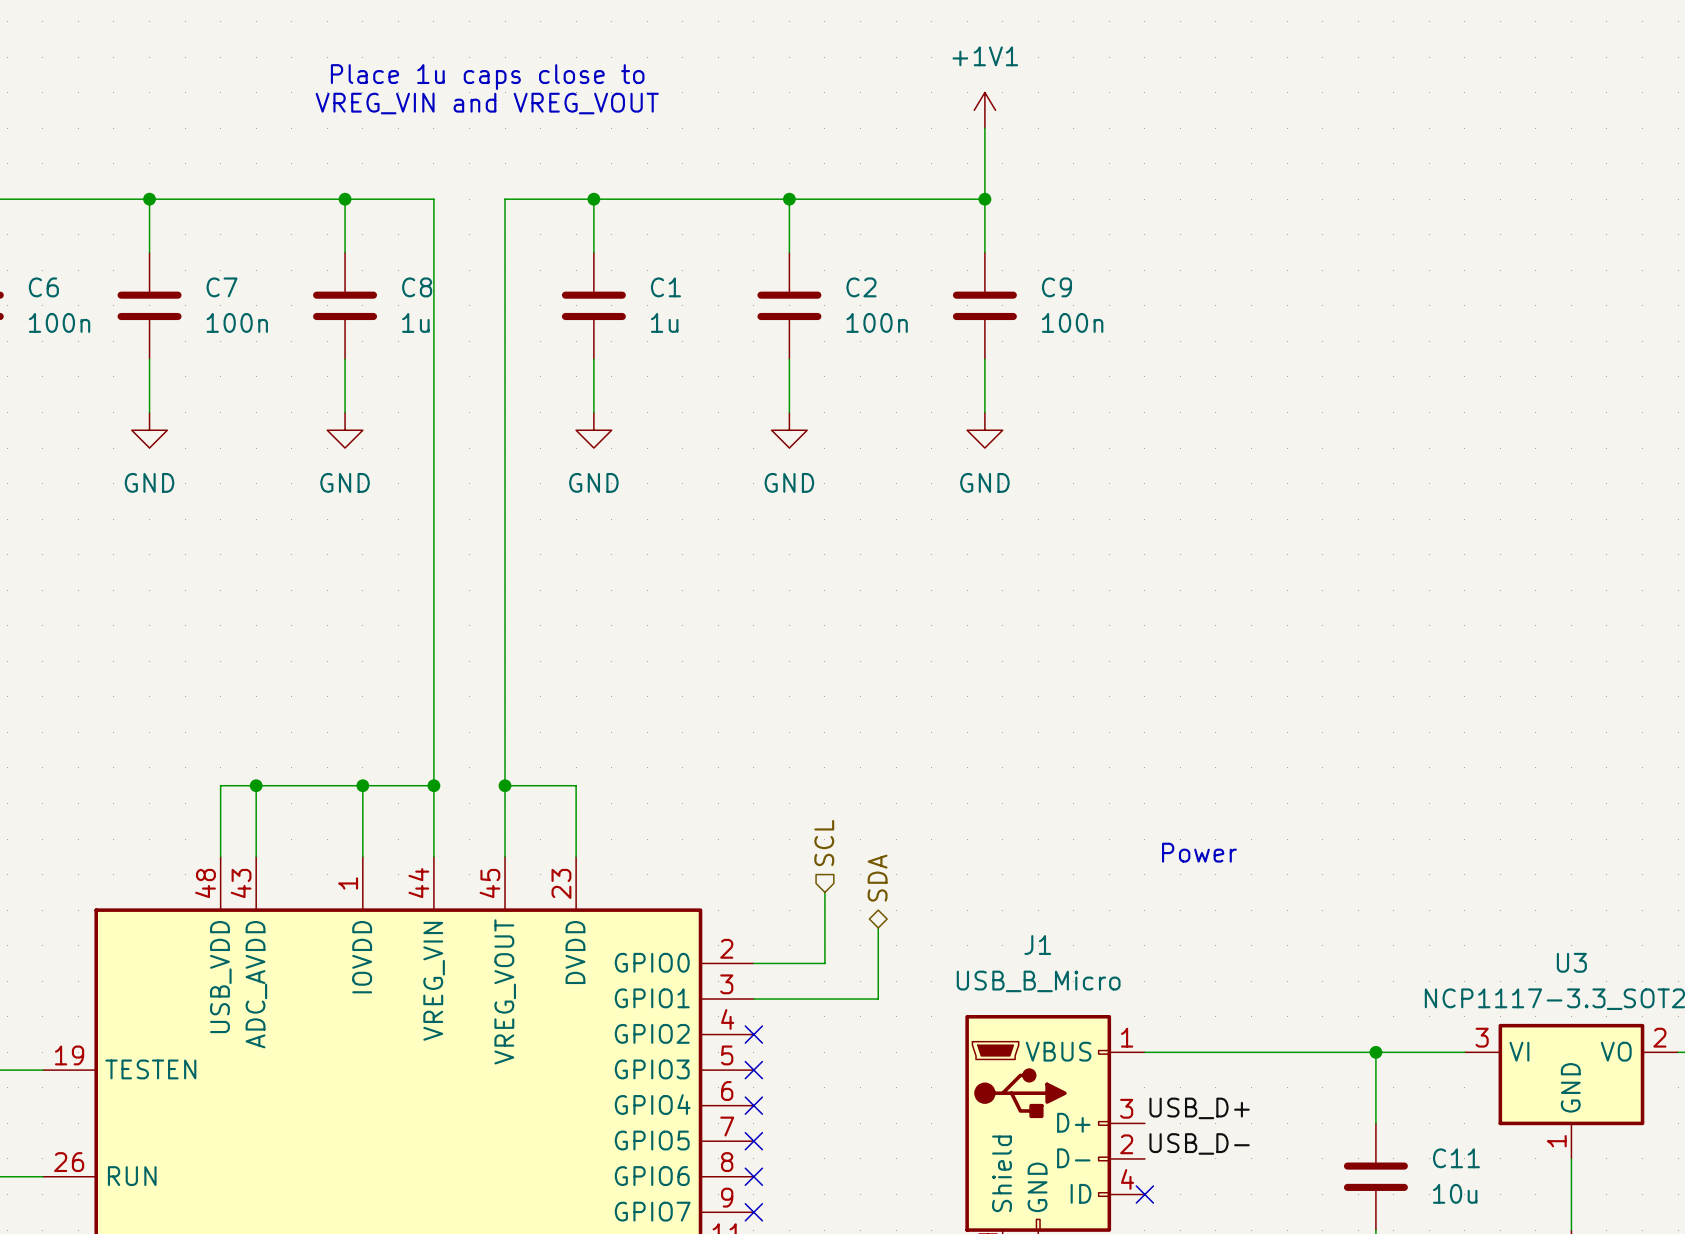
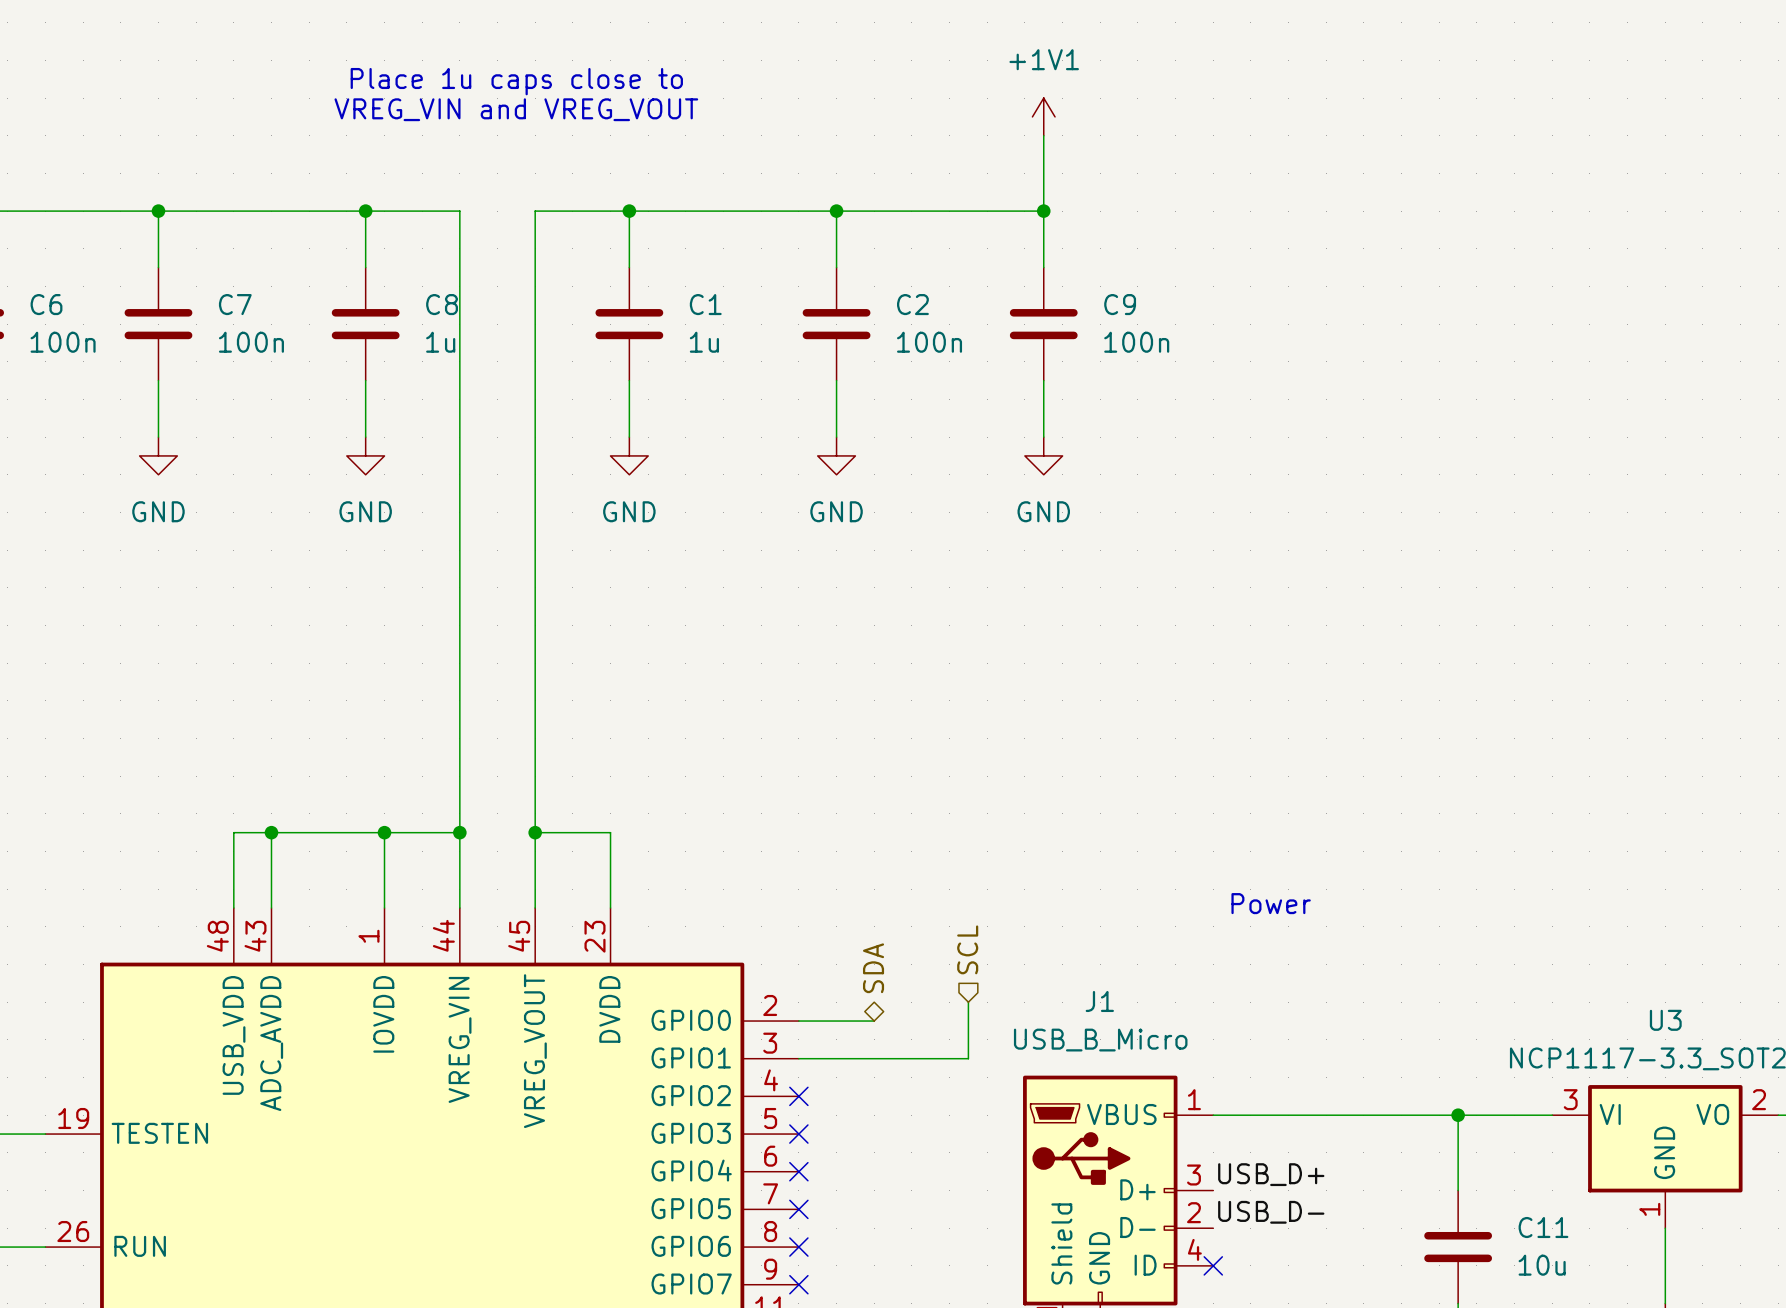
hierarchical label position: SCL (824, 843) -> SCL (967, 949)
hierarchical label position: SDA (877, 878) -> SDA (873, 968)
wire: (824, 892) (824, 963) -> none
wire: (878, 927) (878, 999) -> (968, 1002) (968, 1058) (930, 1058)

